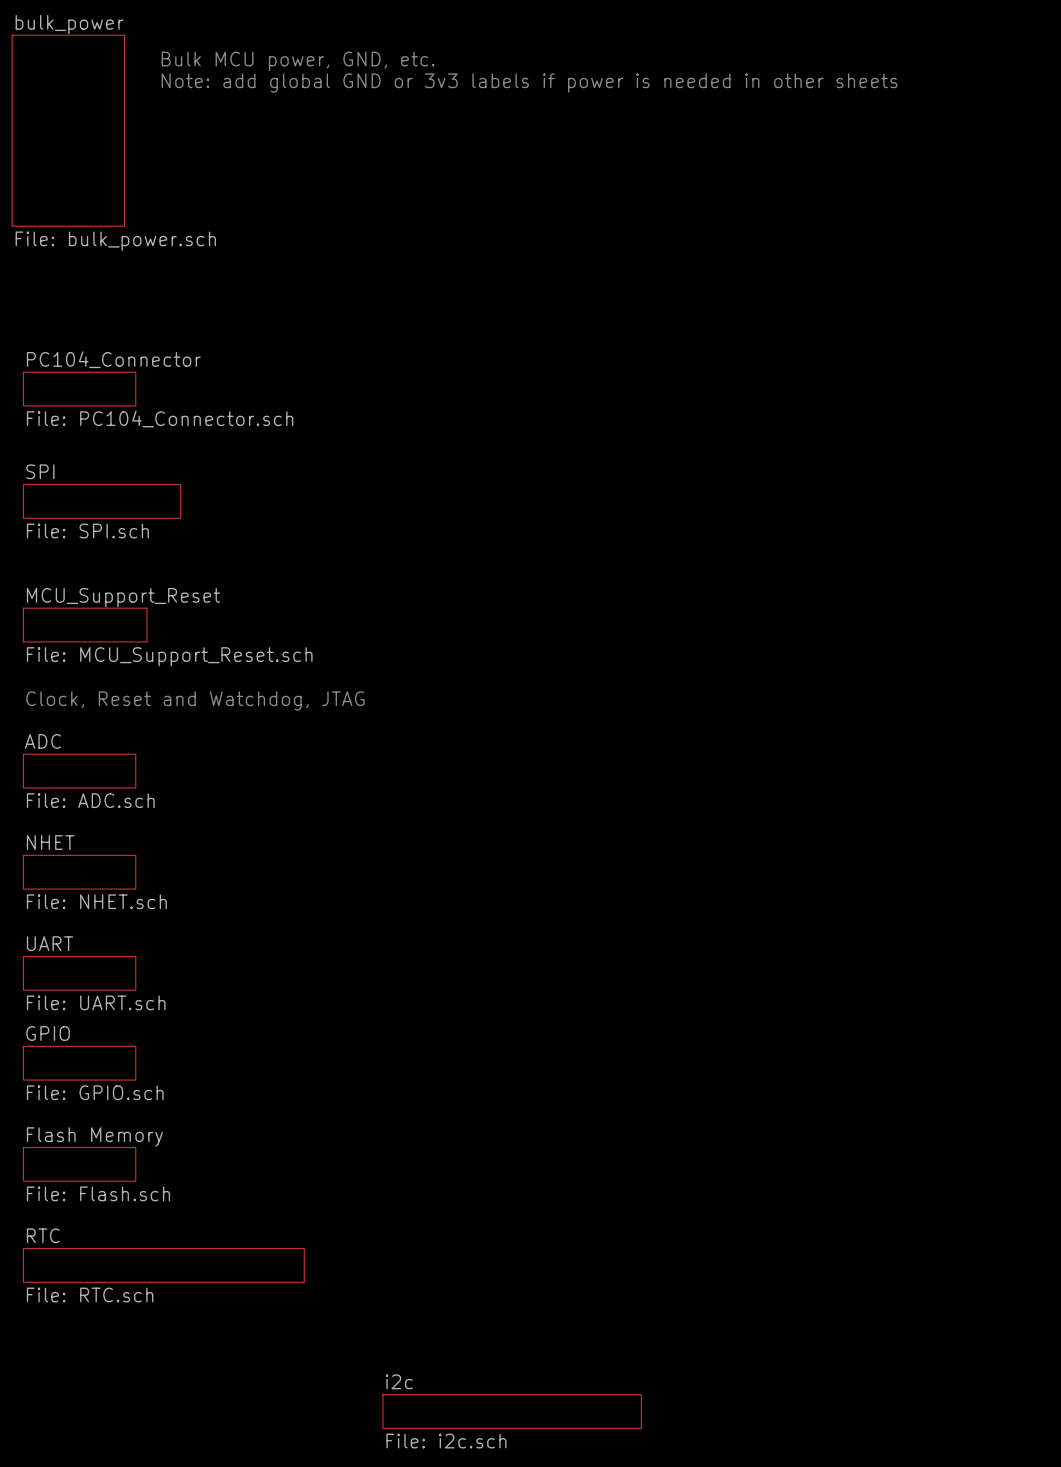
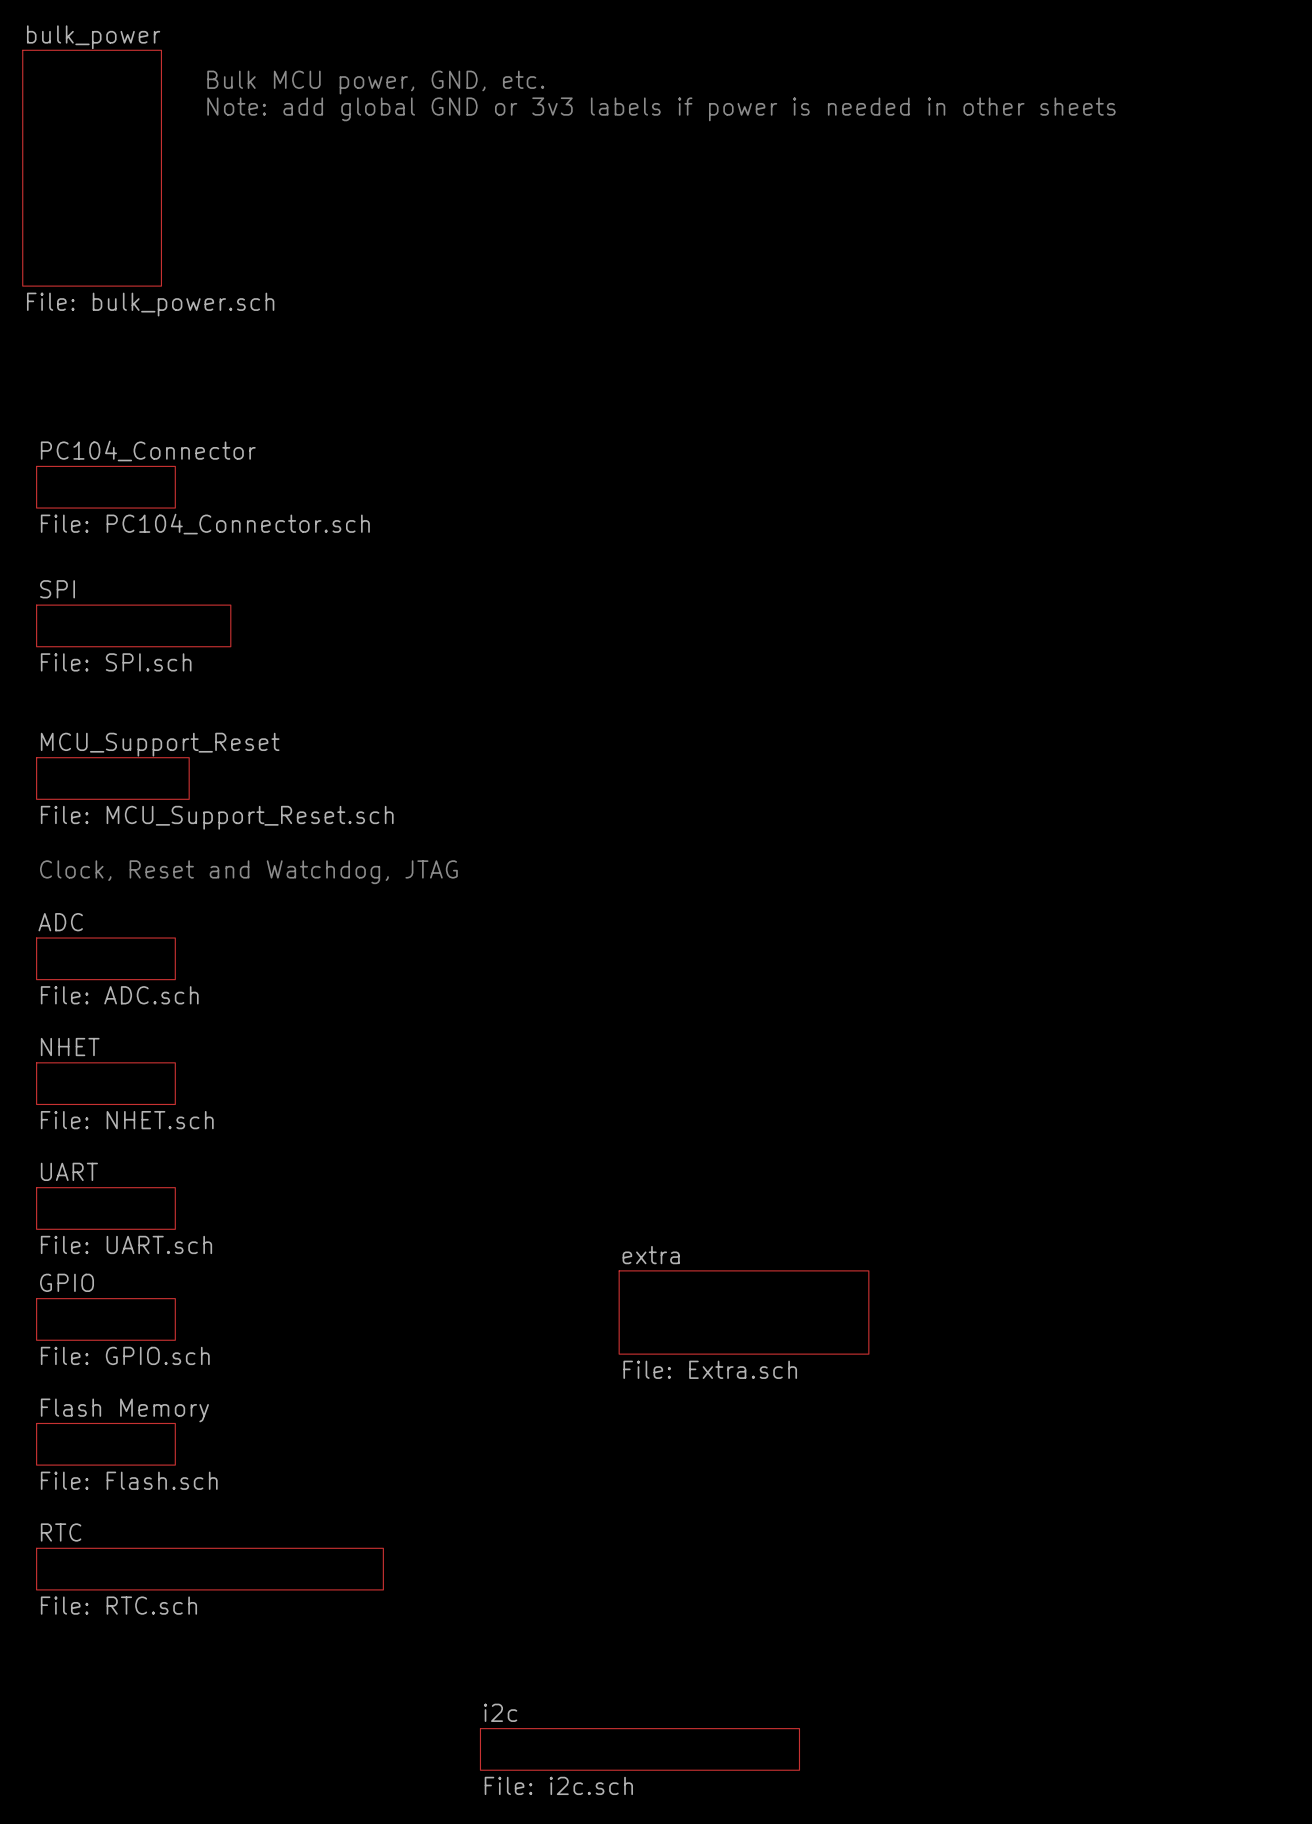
sheet extra: none -> File: Extra.sch (744, 1312)

